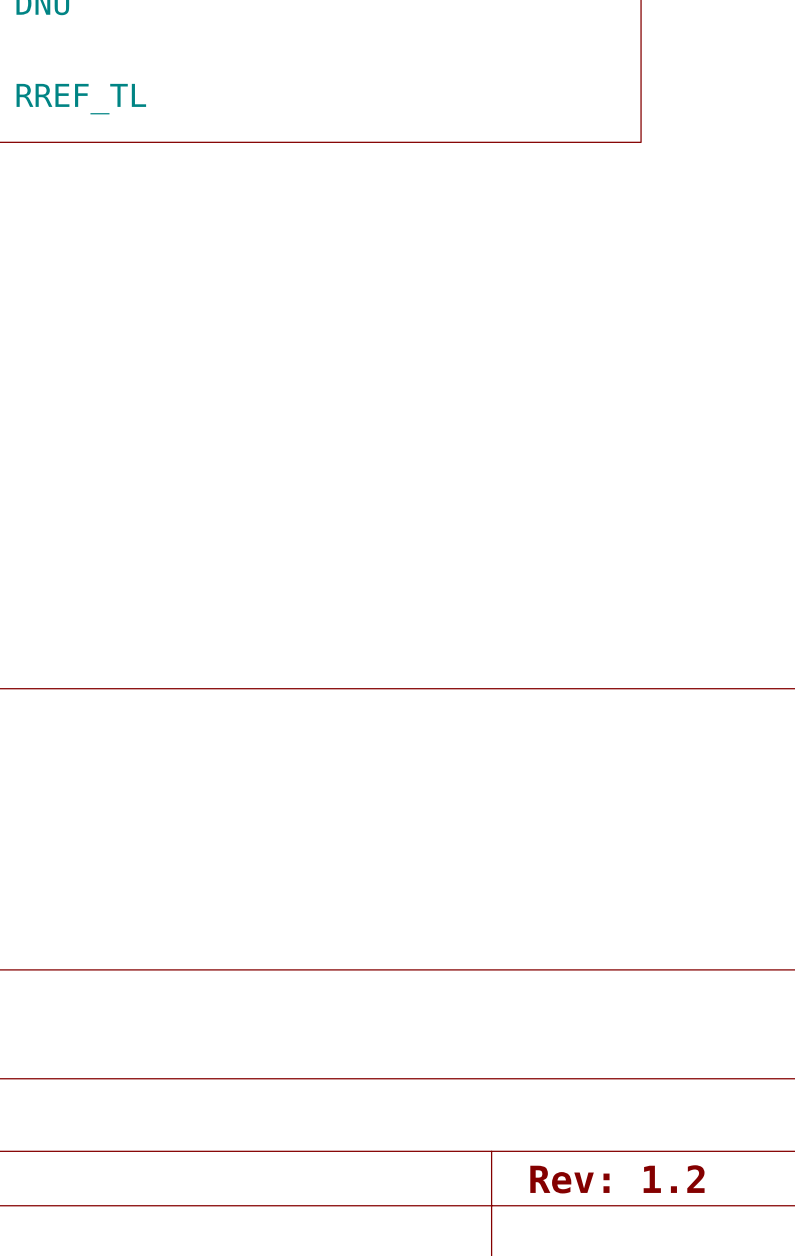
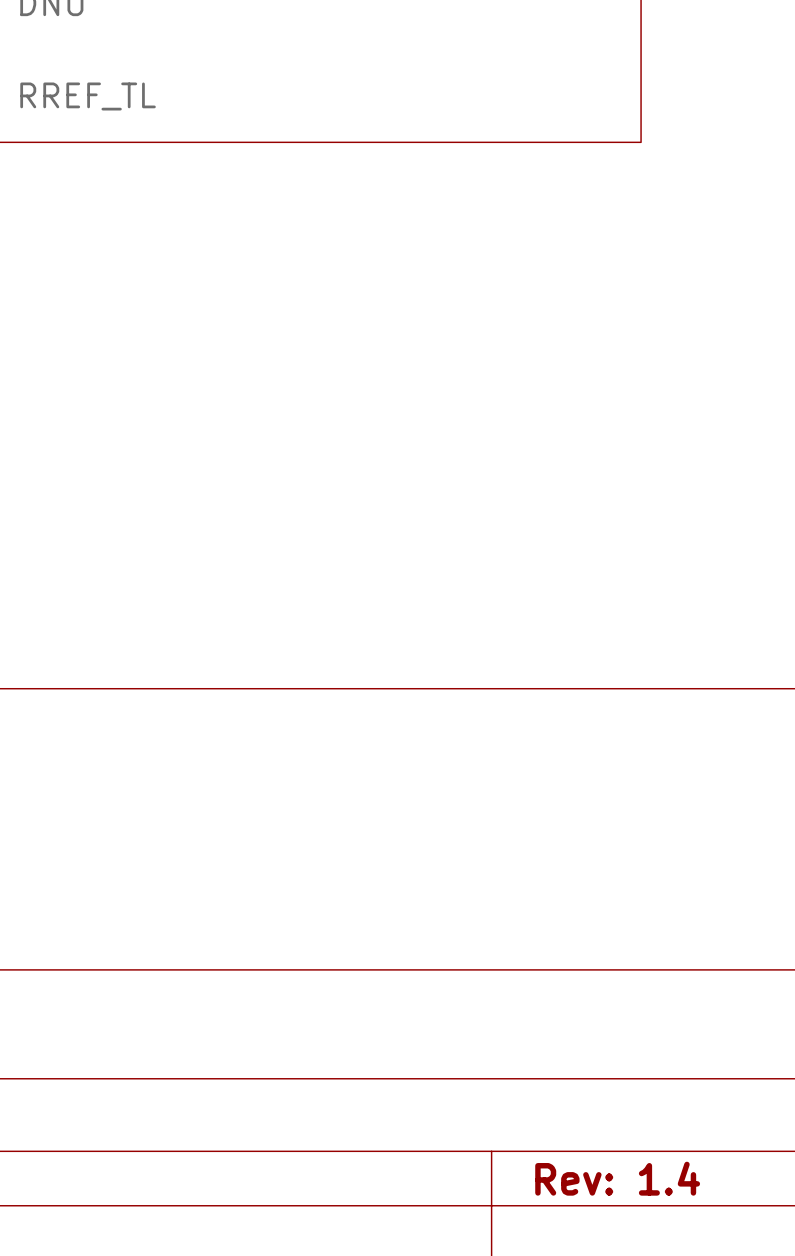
title block: Rev: 1.2 (617, 1179) -> Rev: 1.4 (617, 1178)

